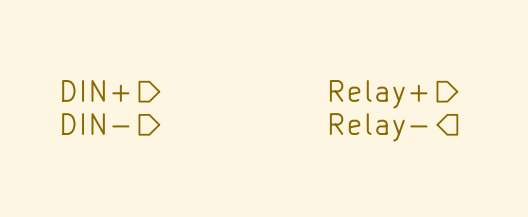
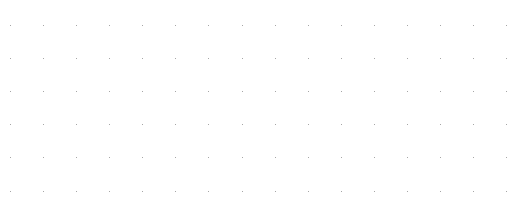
hierarchical label: DIN+ (95, 90) -> none
hierarchical label: Relay+ (378, 94) -> none
hierarchical label: DIN- (95, 124) -> none
hierarchical label: Relay- (378, 127) -> none

